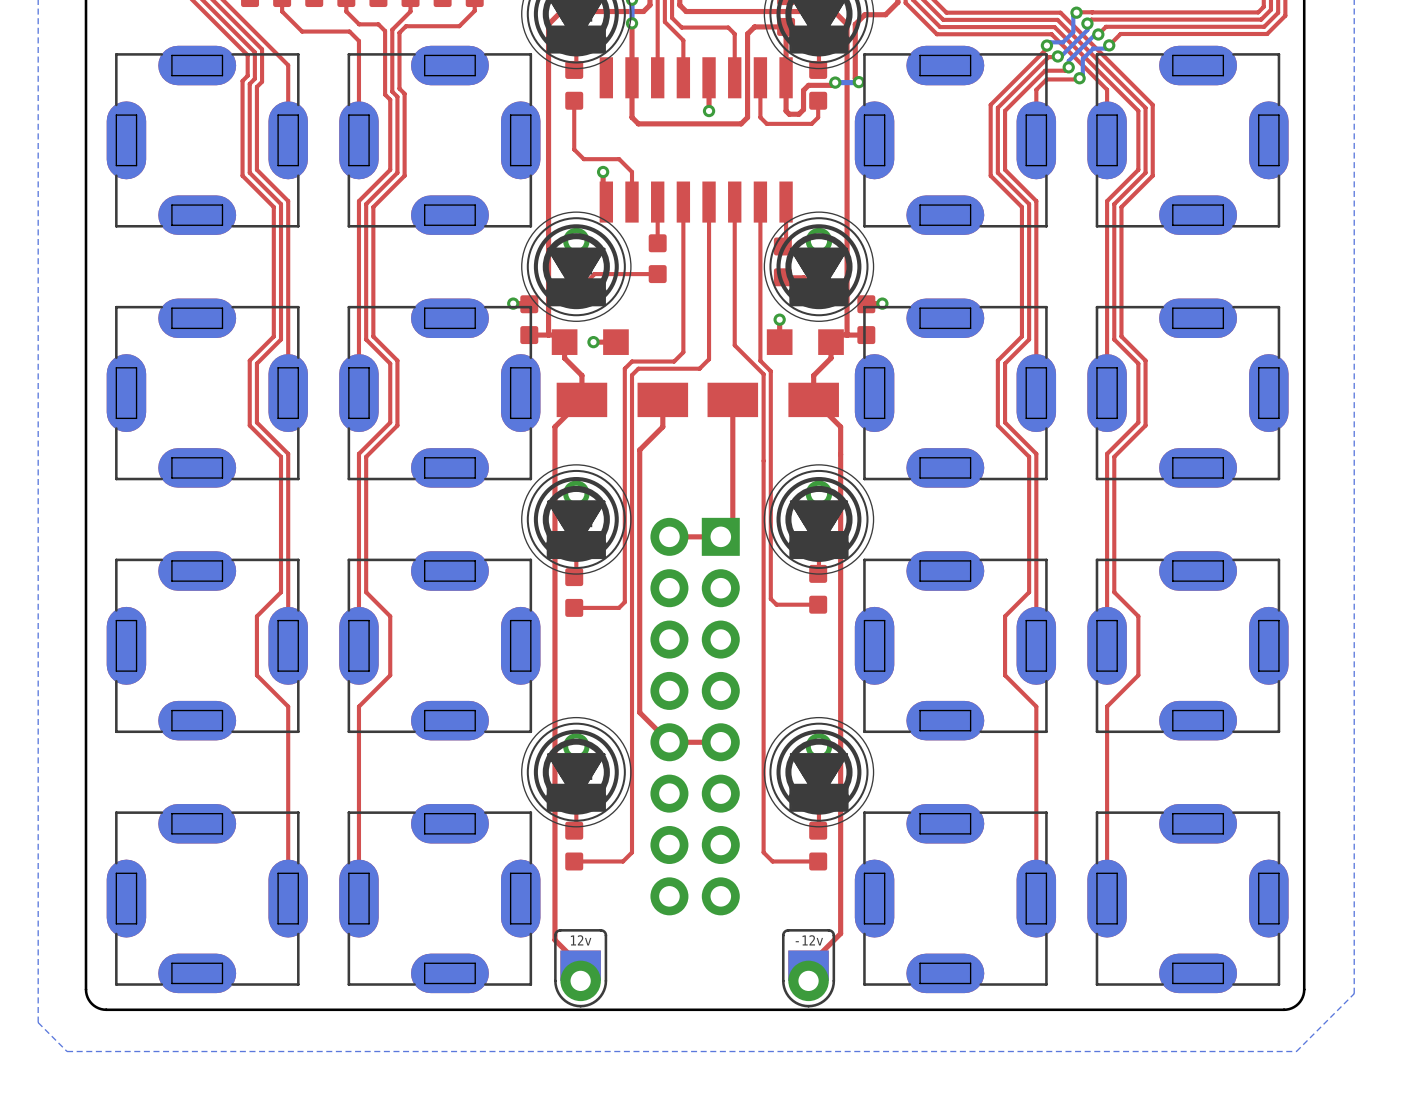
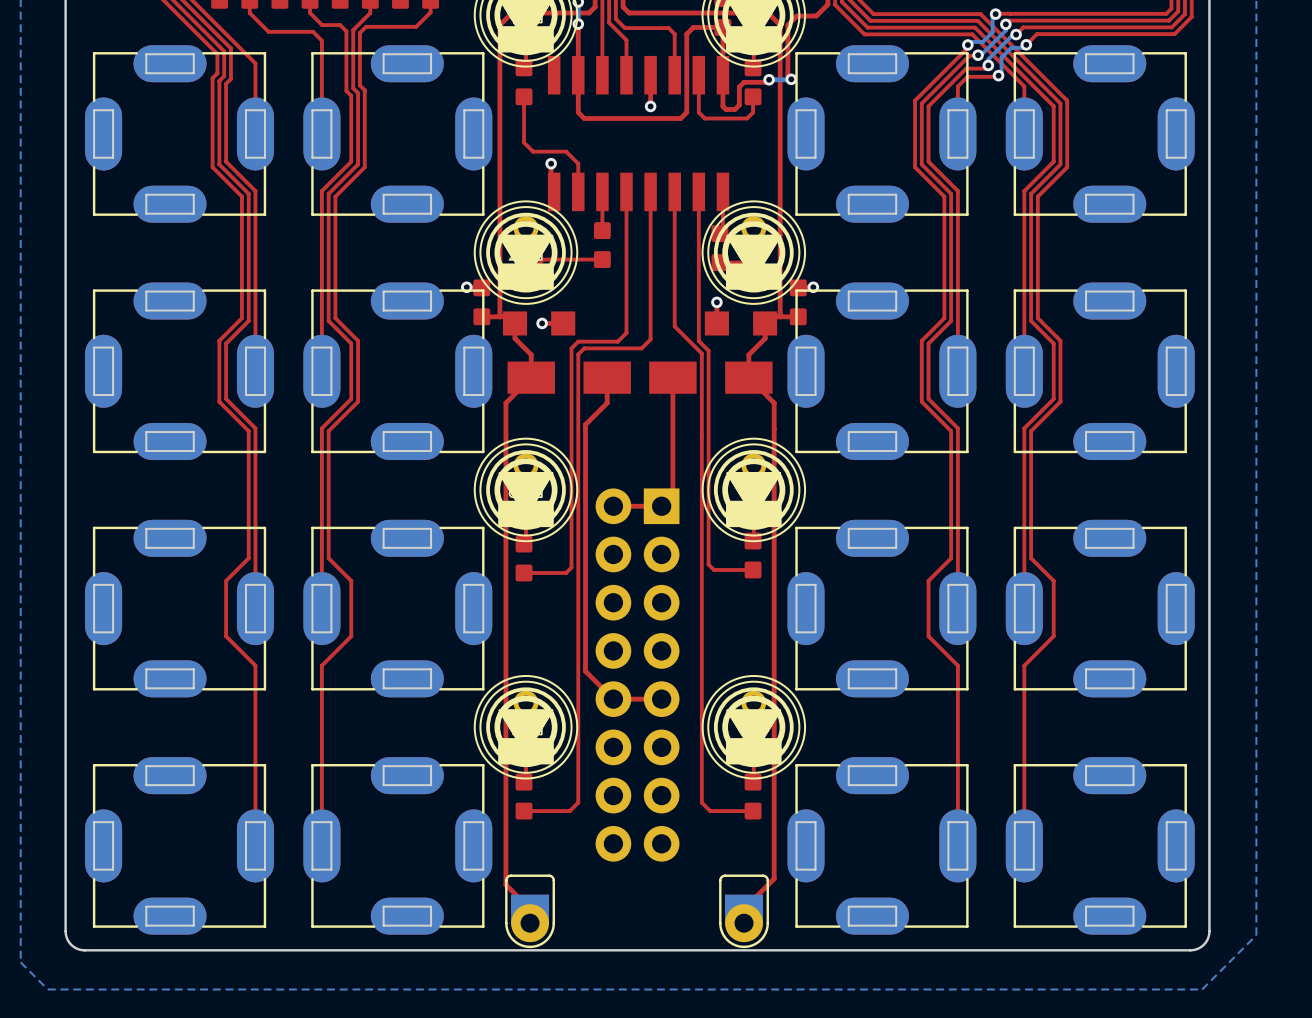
part text: 12v (581, 940) -> none
part text: -12v (809, 940) -> none

